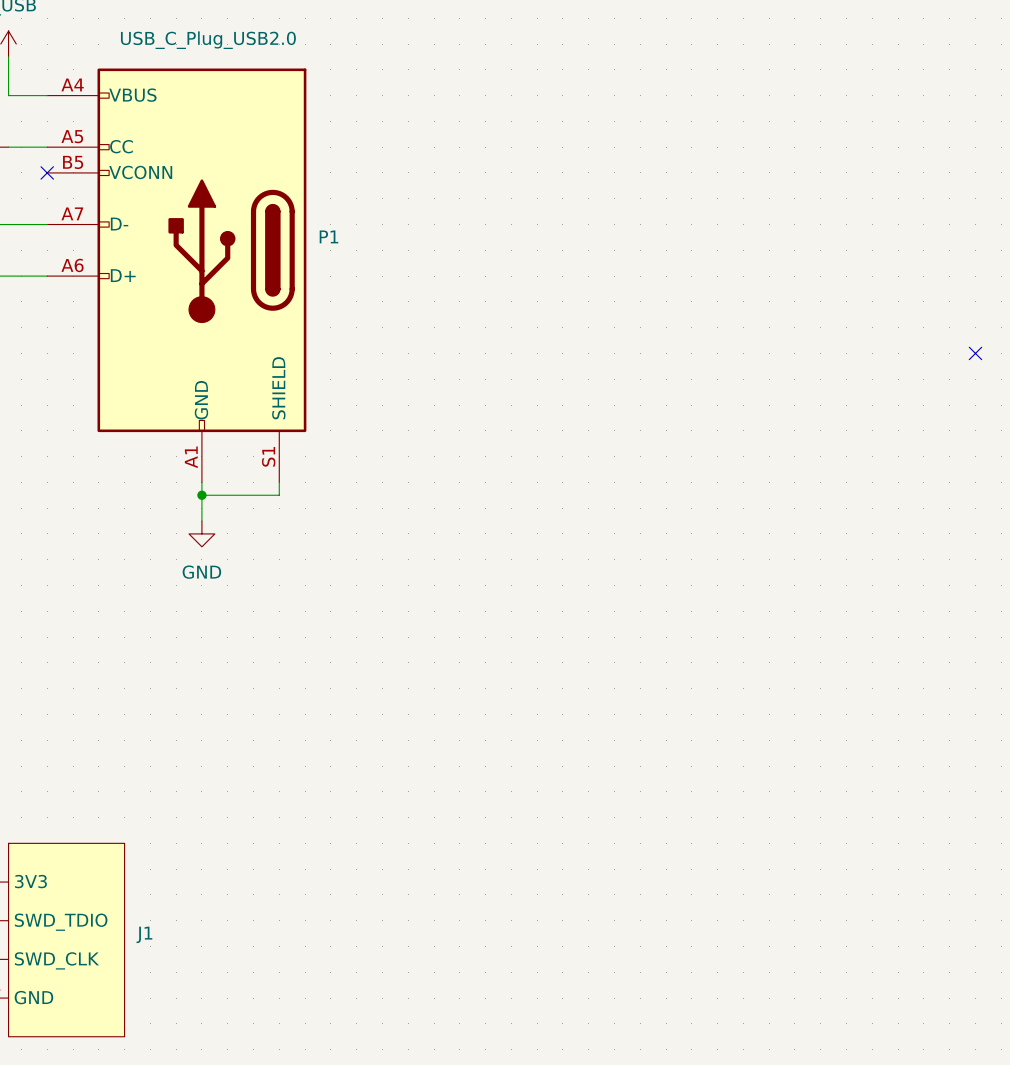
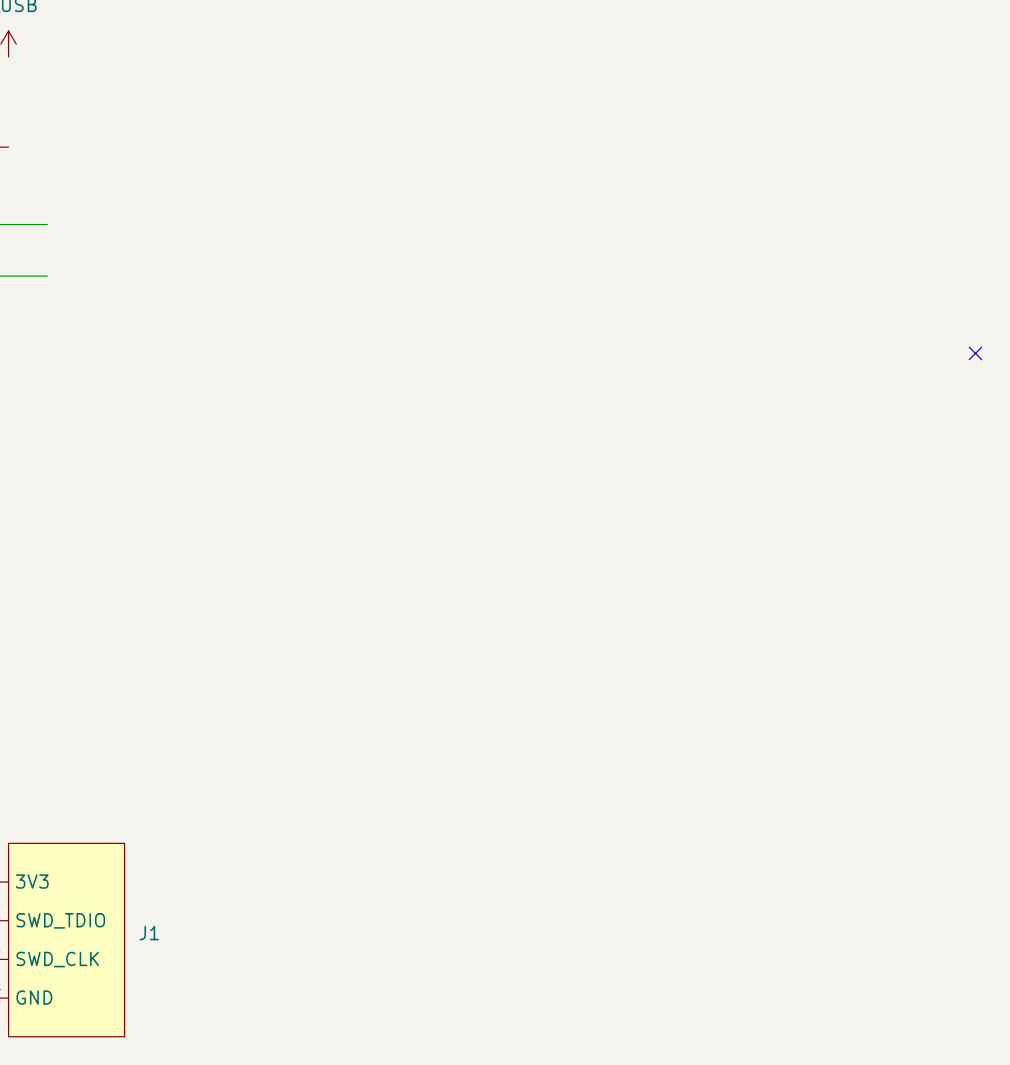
wire: (8, 56) (8, 95) (47, 95) -> none
wire: (8, 147) (47, 147) -> none
no-connect mark: (47, 172) -> none
P1: USB_C_Plug_USB2.0 (176, 275) -> none
wire: (201, 482) (201, 521) -> none
wire: (279, 482) (279, 495) (201, 495) -> none
junction: (201, 495) -> none
power symbol: GND (201, 533) -> none

